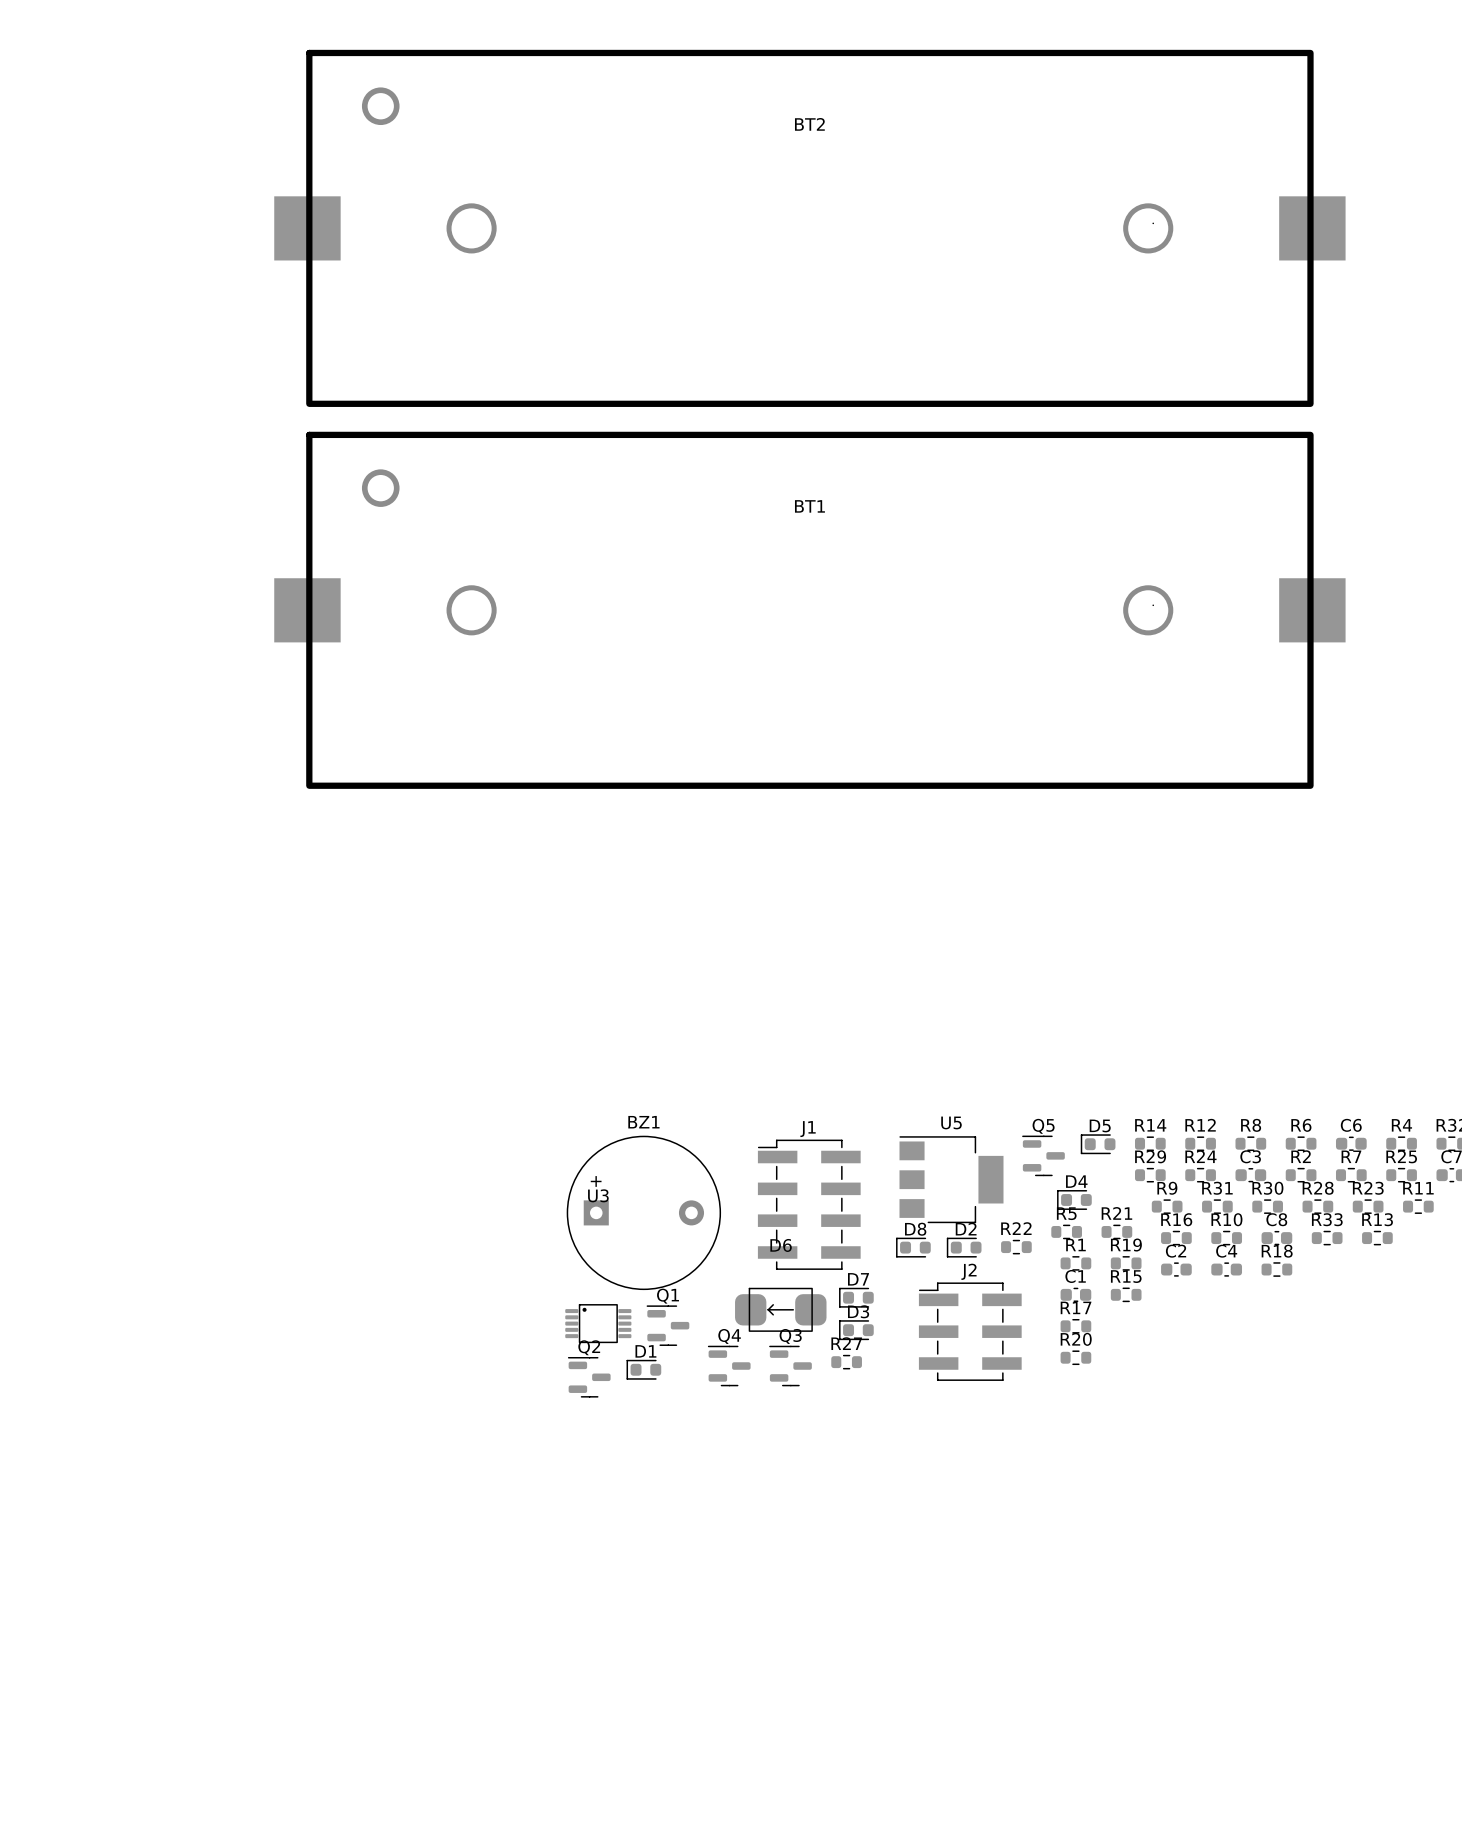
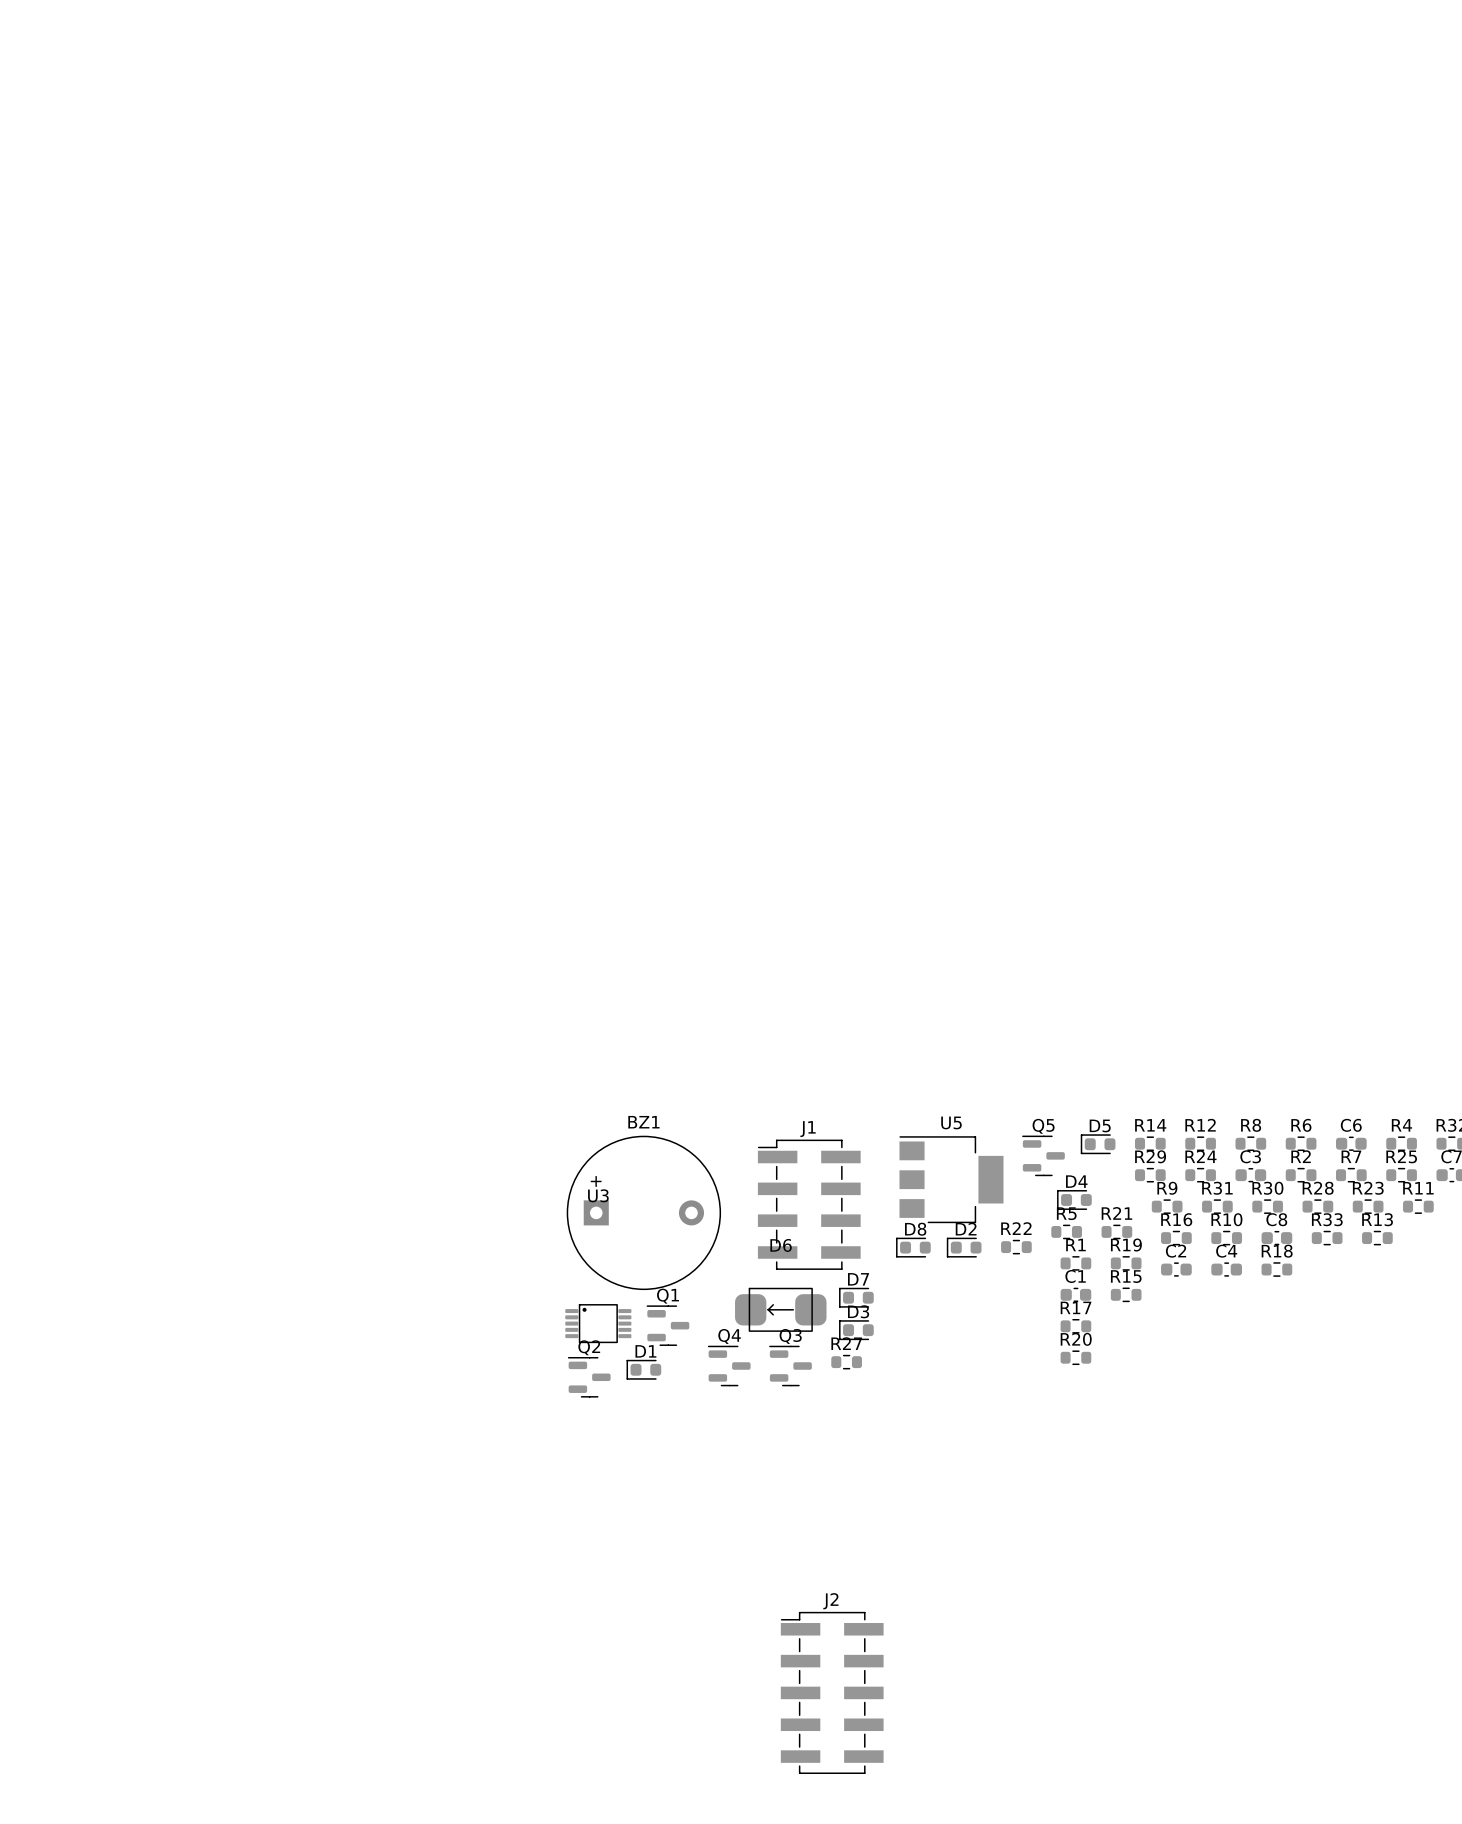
BT2: (809, 228) -> none
BT1: (809, 610) -> none
J2 name position: J2 (968, 1271) -> J2 (830, 1601)
J2 footprint: [918, 1282, 1022, 1381] -> [780, 1611, 884, 1775]

